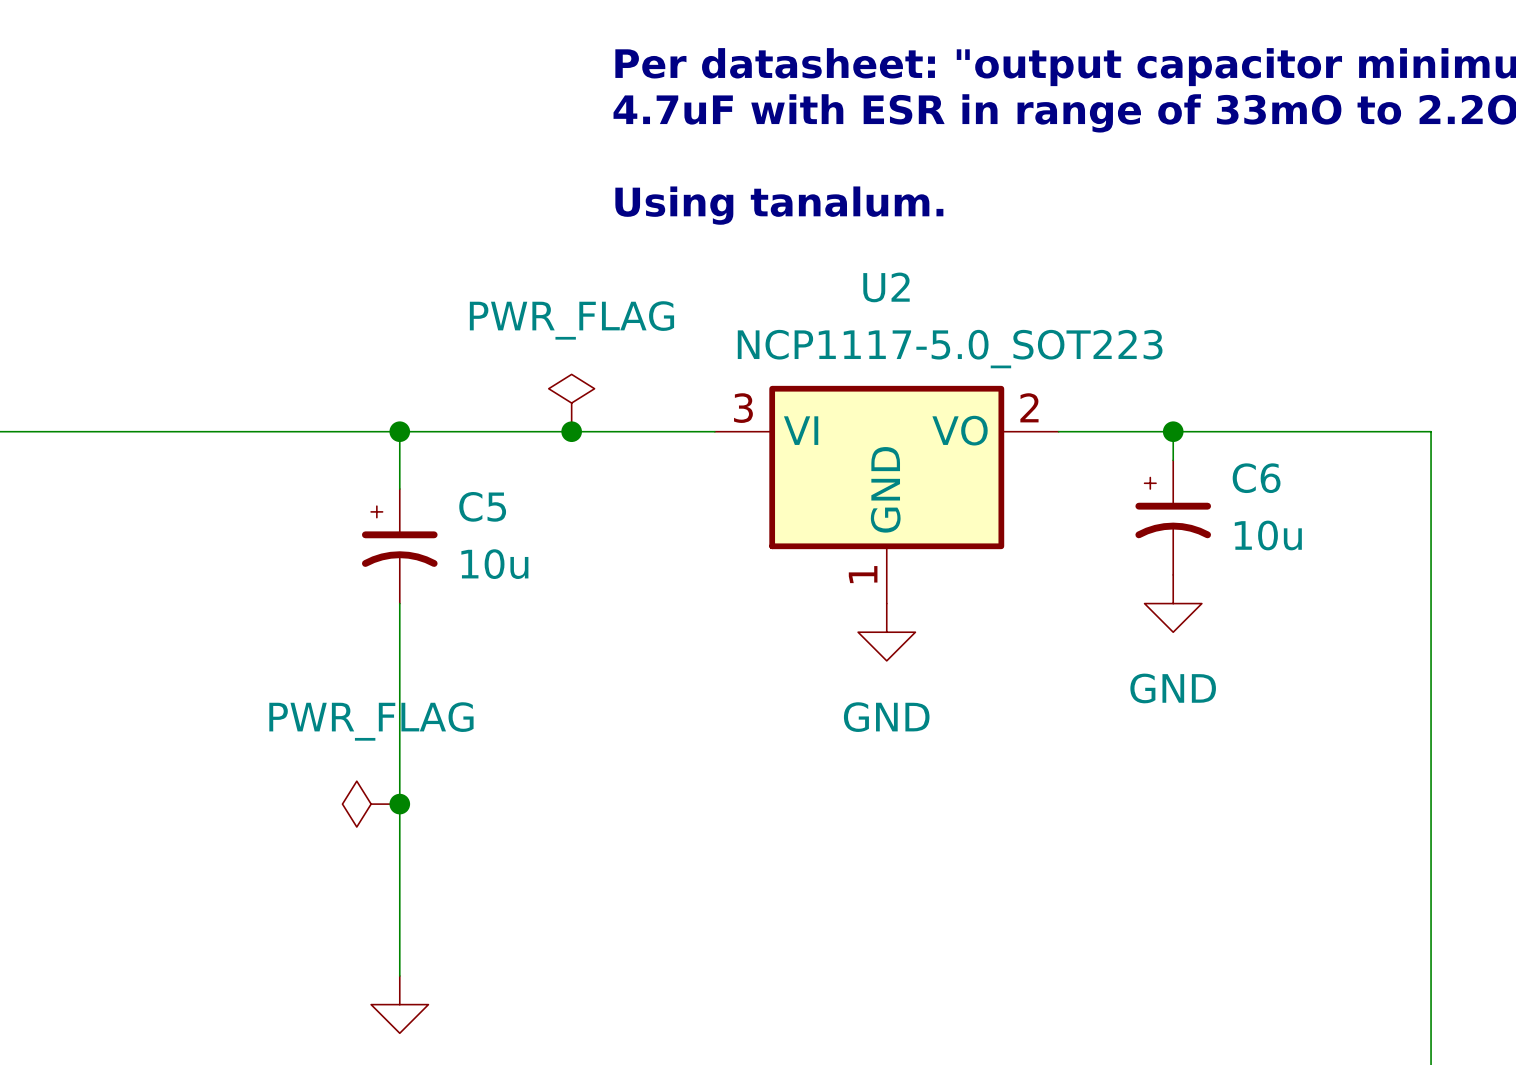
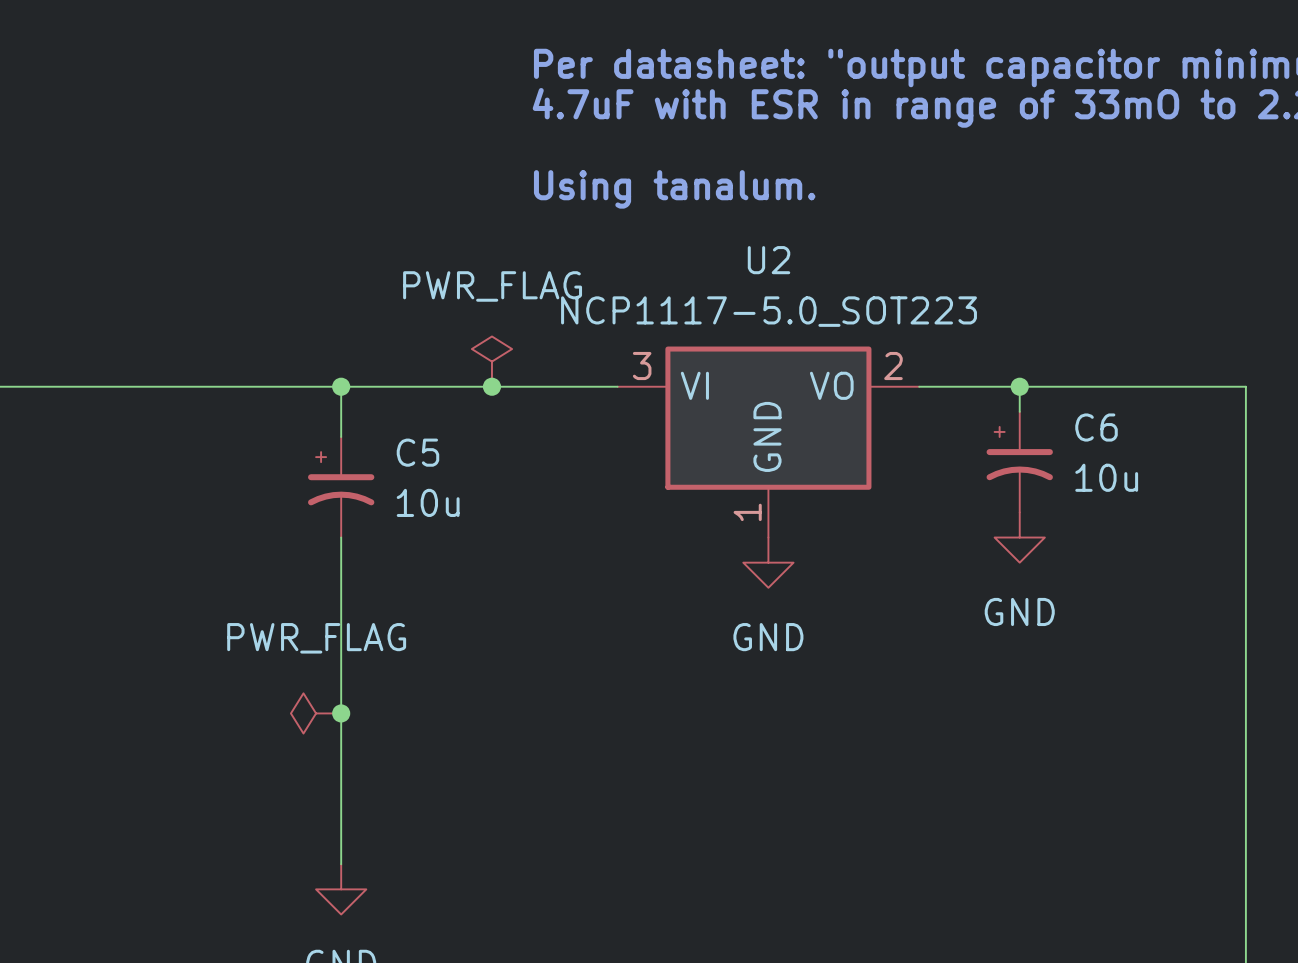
U2 value position: NCP1117-5.0_SOT223 (950, 349) -> NCP1117-5.0_SOT223 (769, 311)

